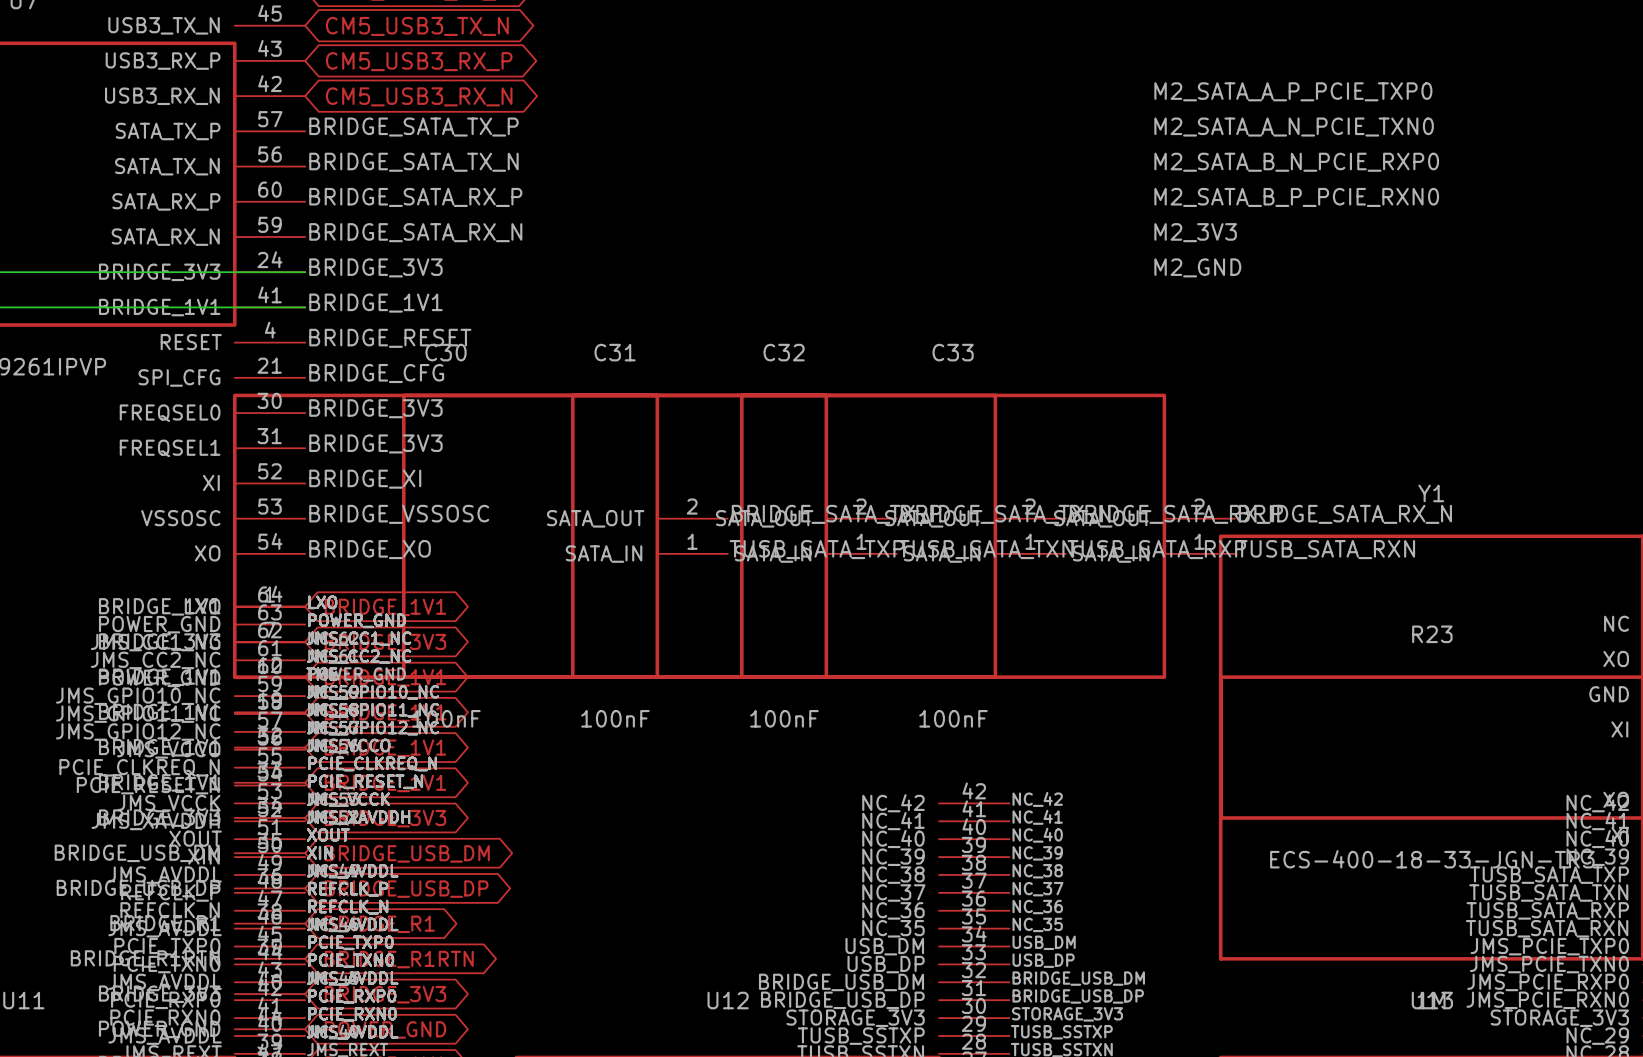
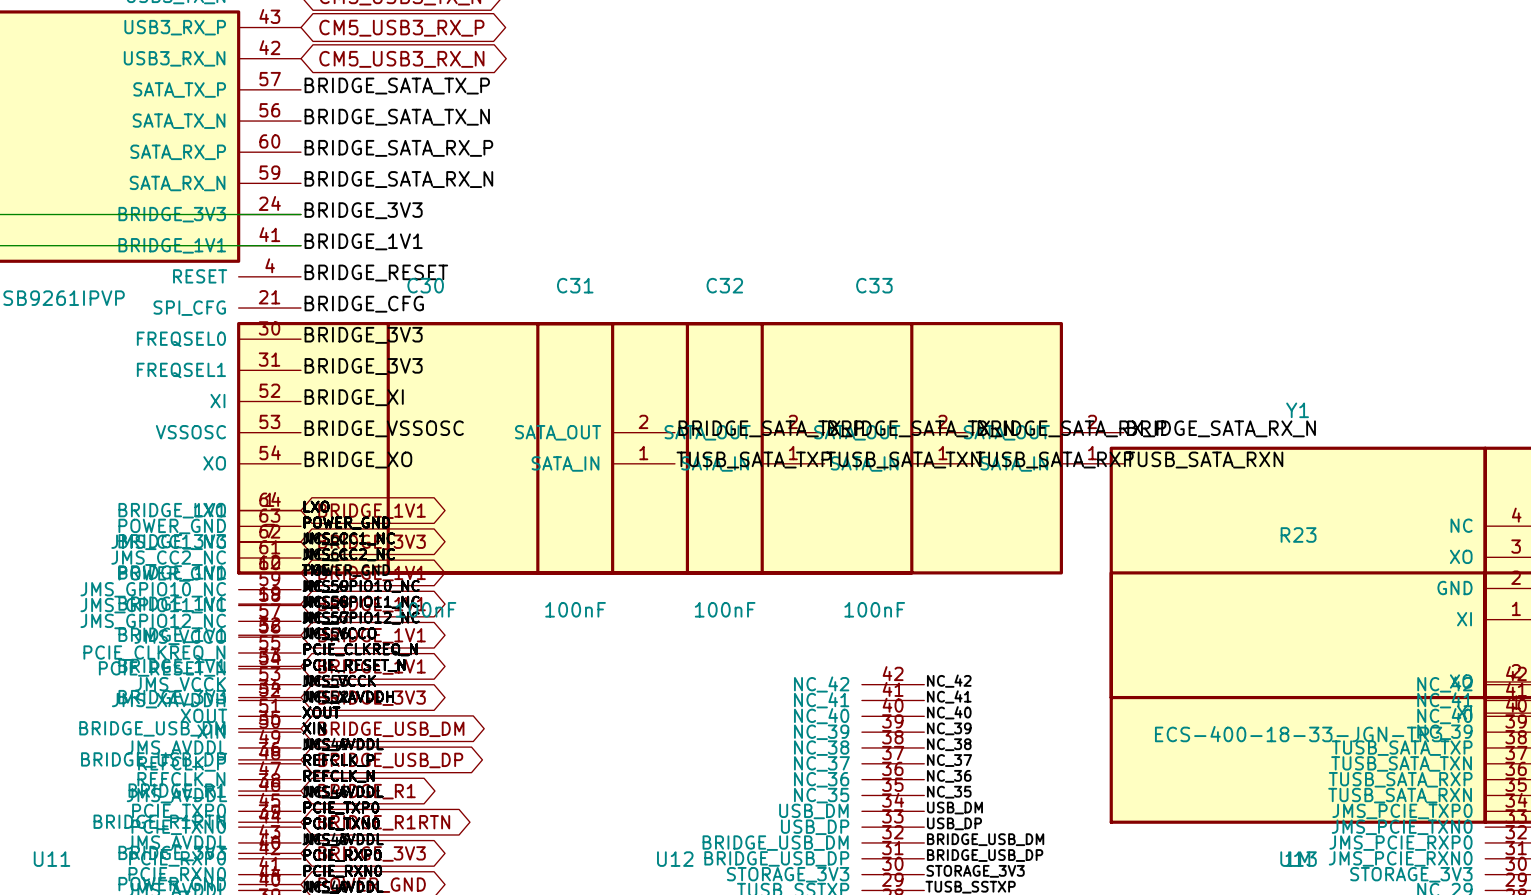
label: M2_SATA_A_P_PCIE_TXP0 (1293, 91) -> none
label: M2_SATA_A_N_PCIE_TXN0 (1294, 127) -> none
label: M2_SATA_B_N_PCIE_RXP0 (1296, 162) -> none
label: M2_SATA_B_P_PCIE_RXN0 (1296, 197) -> none
label: M2_3V3 (1195, 232) -> none
label: M2_GND (1197, 267) -> none

